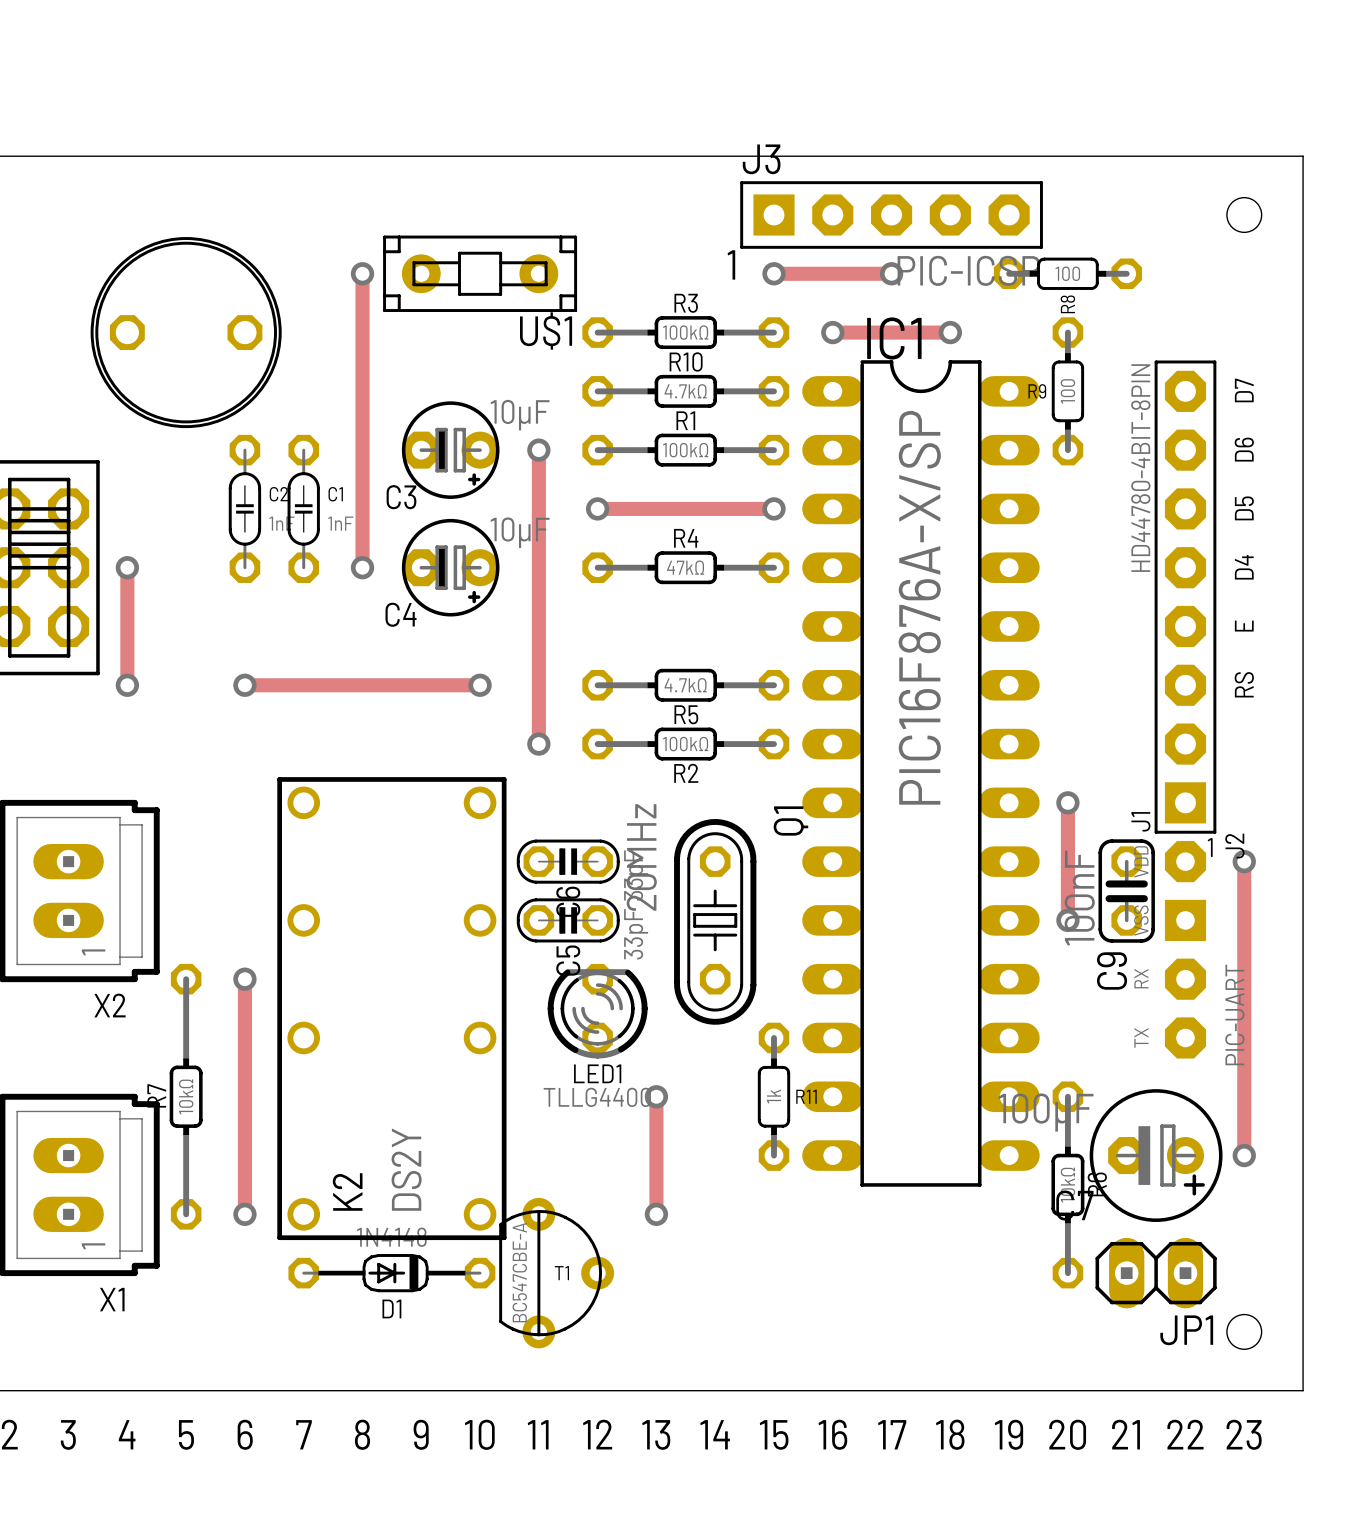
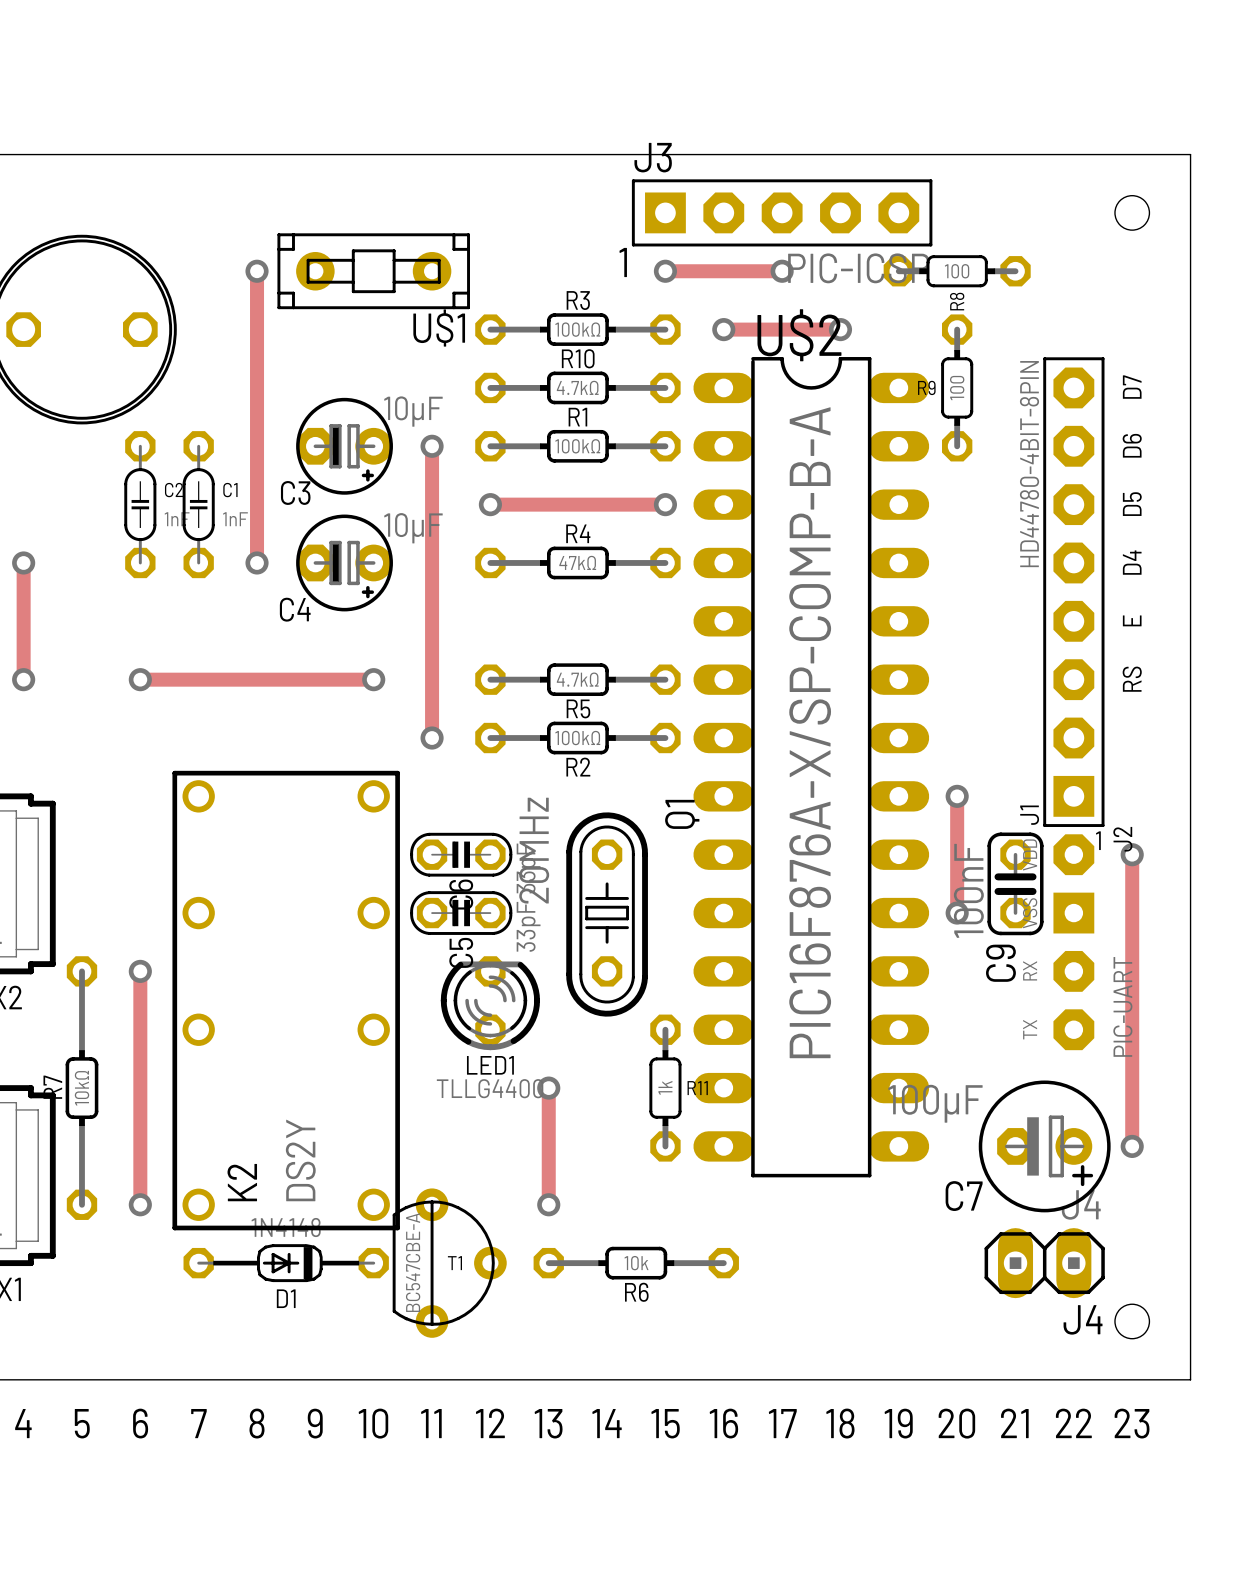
IC1 name: IC1 (894, 338) -> U$2 (799, 335)
IC1 value: PIC16F876A-X/SP (919, 607) -> PIC16F876A-X/SP-COMP-B-A (810, 732)
R6 rotation: 0° (1067, 1184) -> 90° clockwise (636, 1263)
R6 position: (1067, 1184) -> (636, 1263)
R6 value: 10kΩ (1067, 1185) -> 10k (636, 1263)
JP1 value: none -> J4 (1081, 1204)
JP1 name: JP1 (1186, 1330) -> J4 (1083, 1319)

